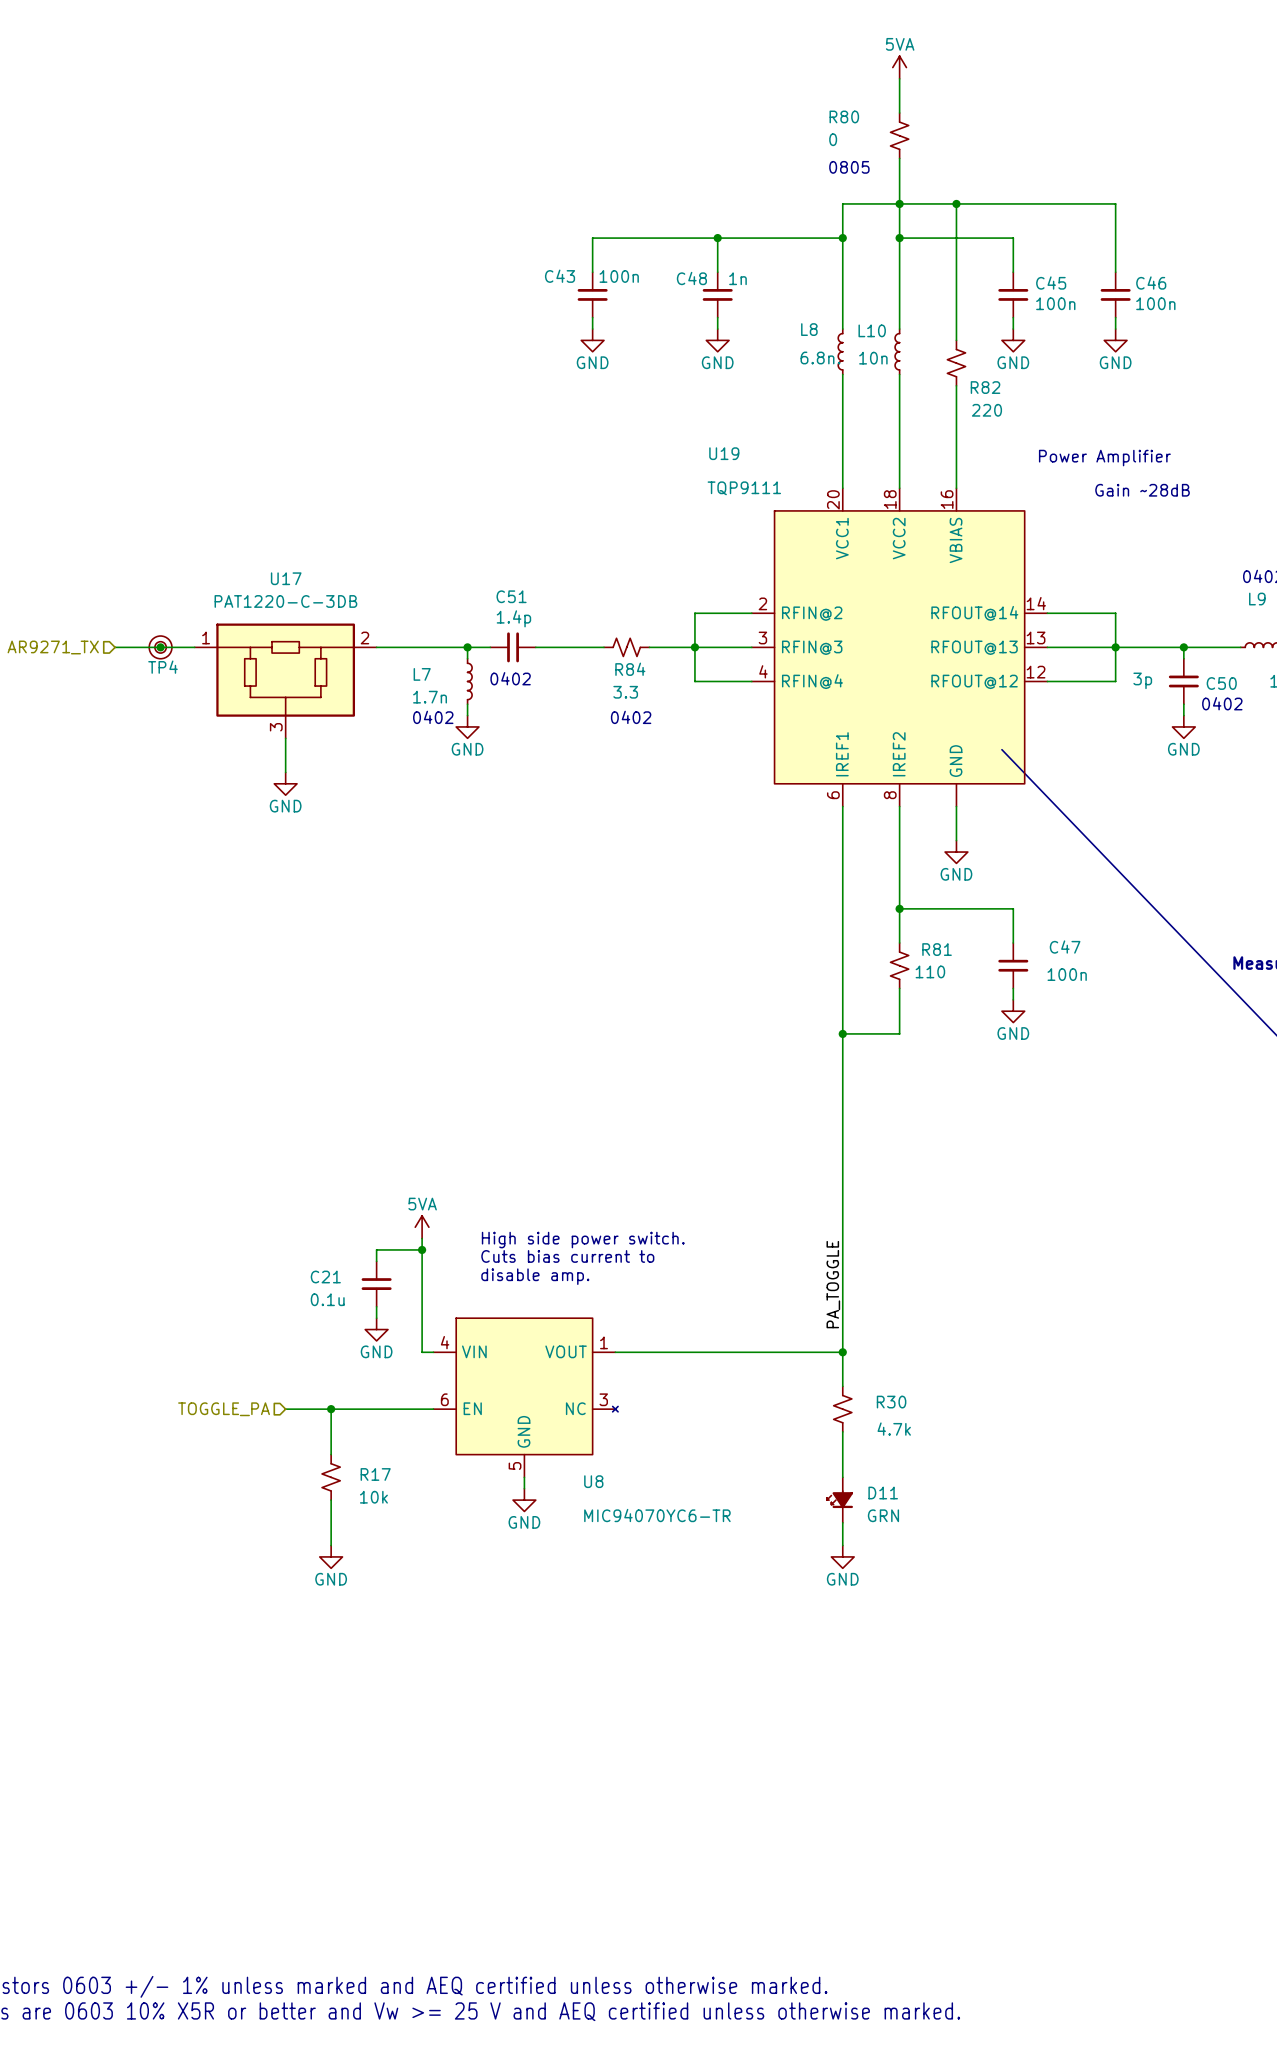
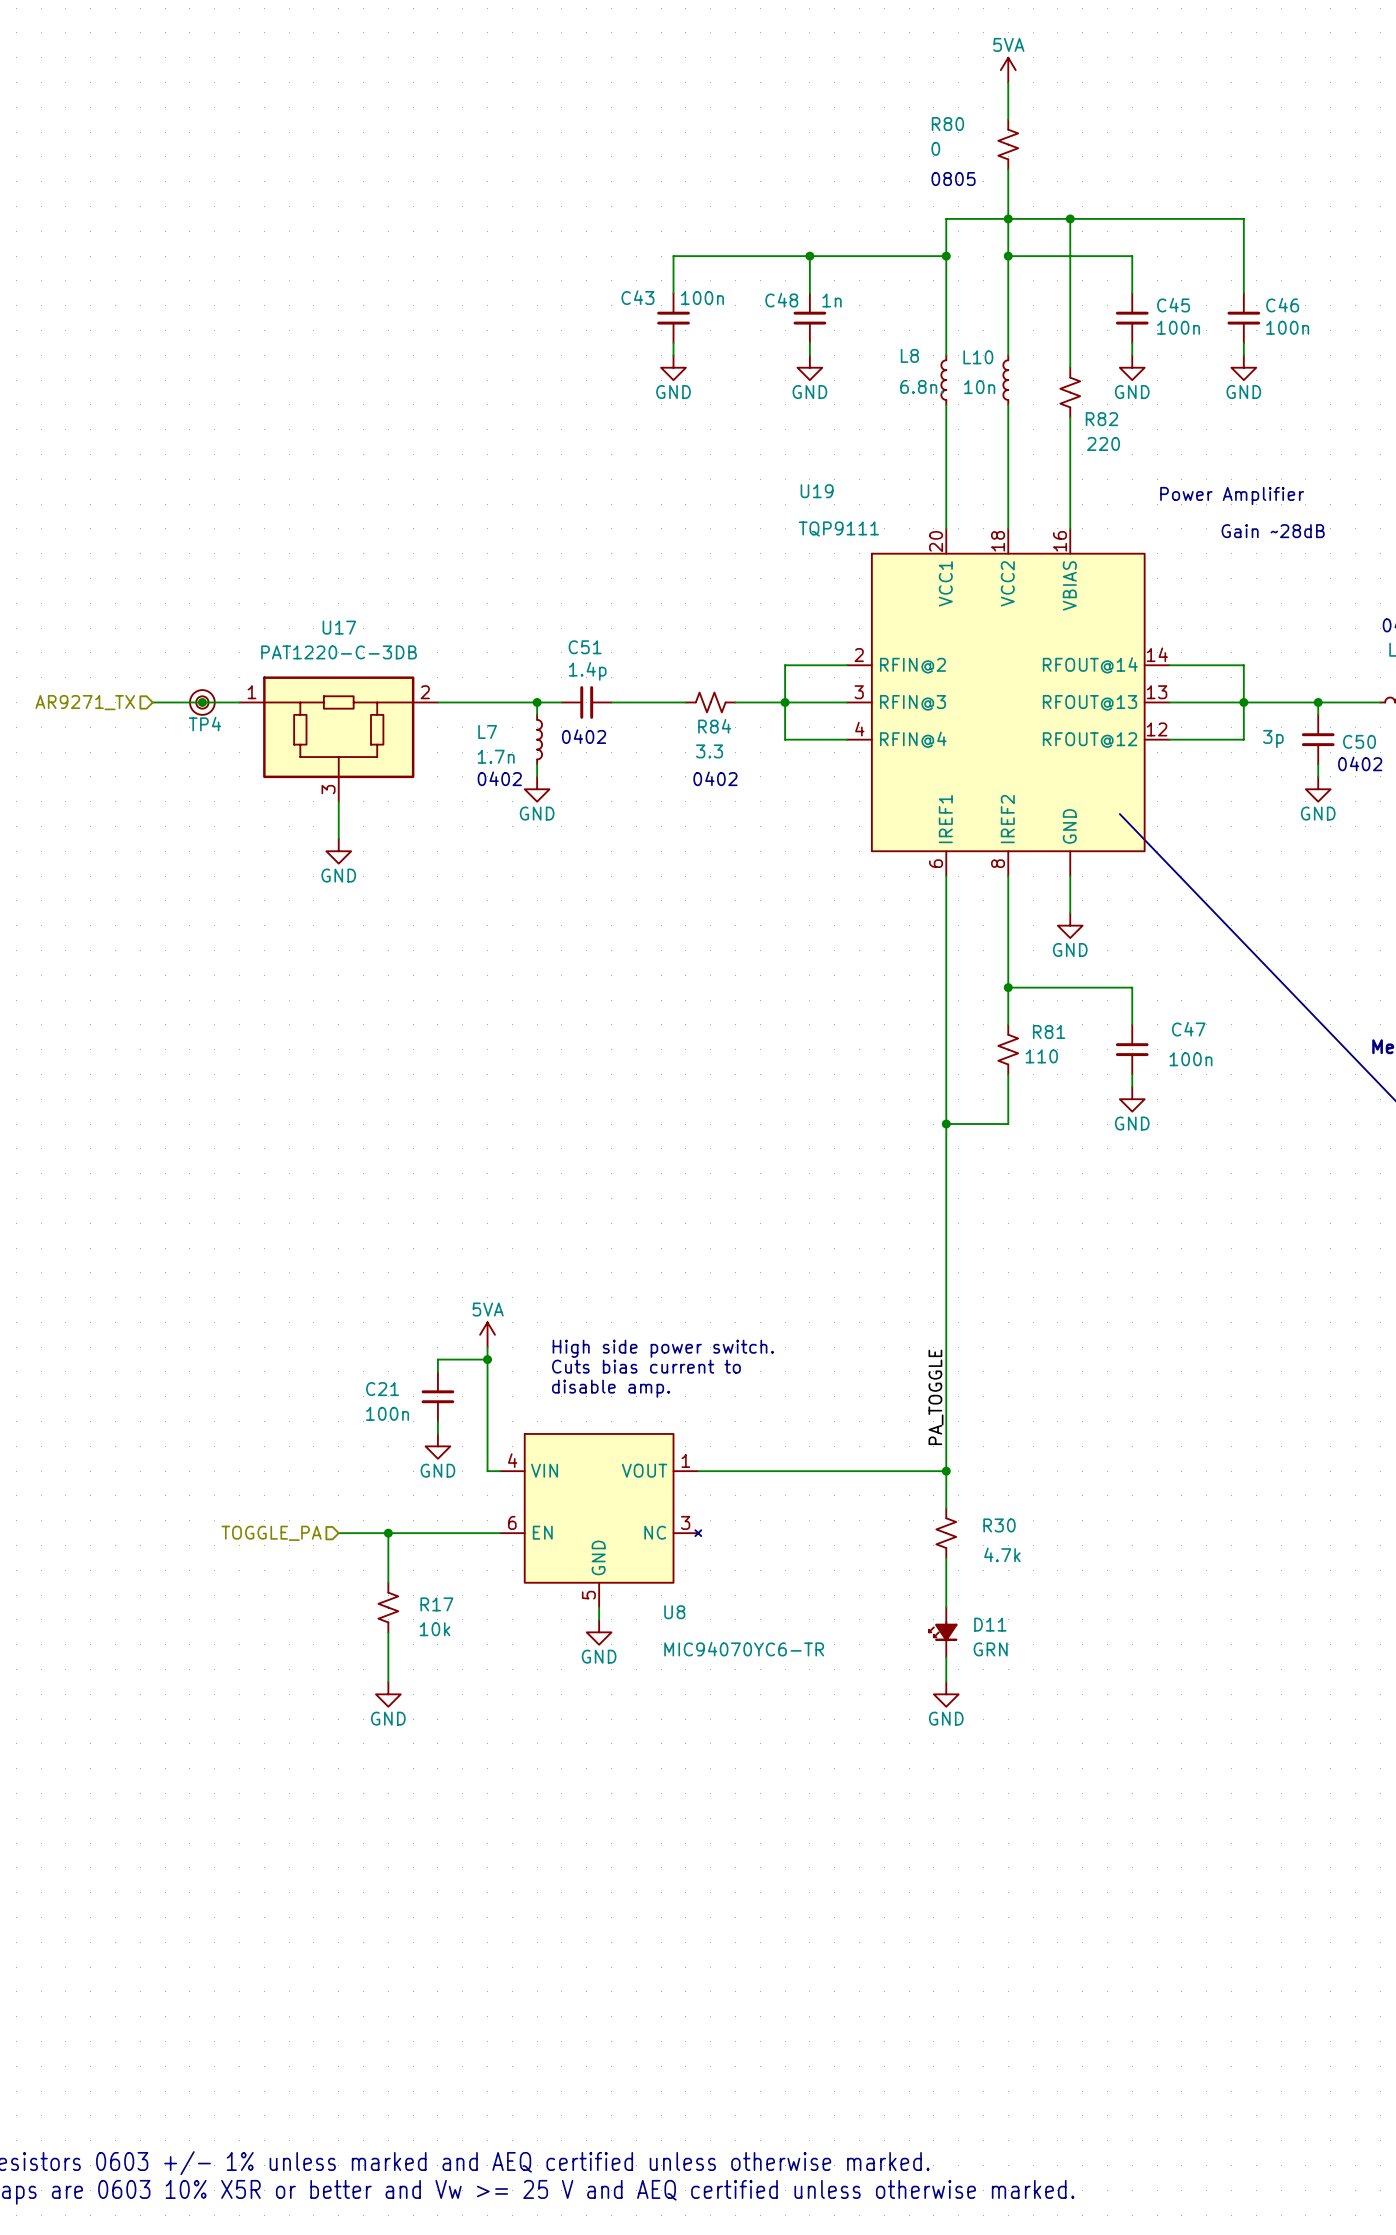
C21 value: 0.1u (327, 1299) -> 100n (387, 1413)

